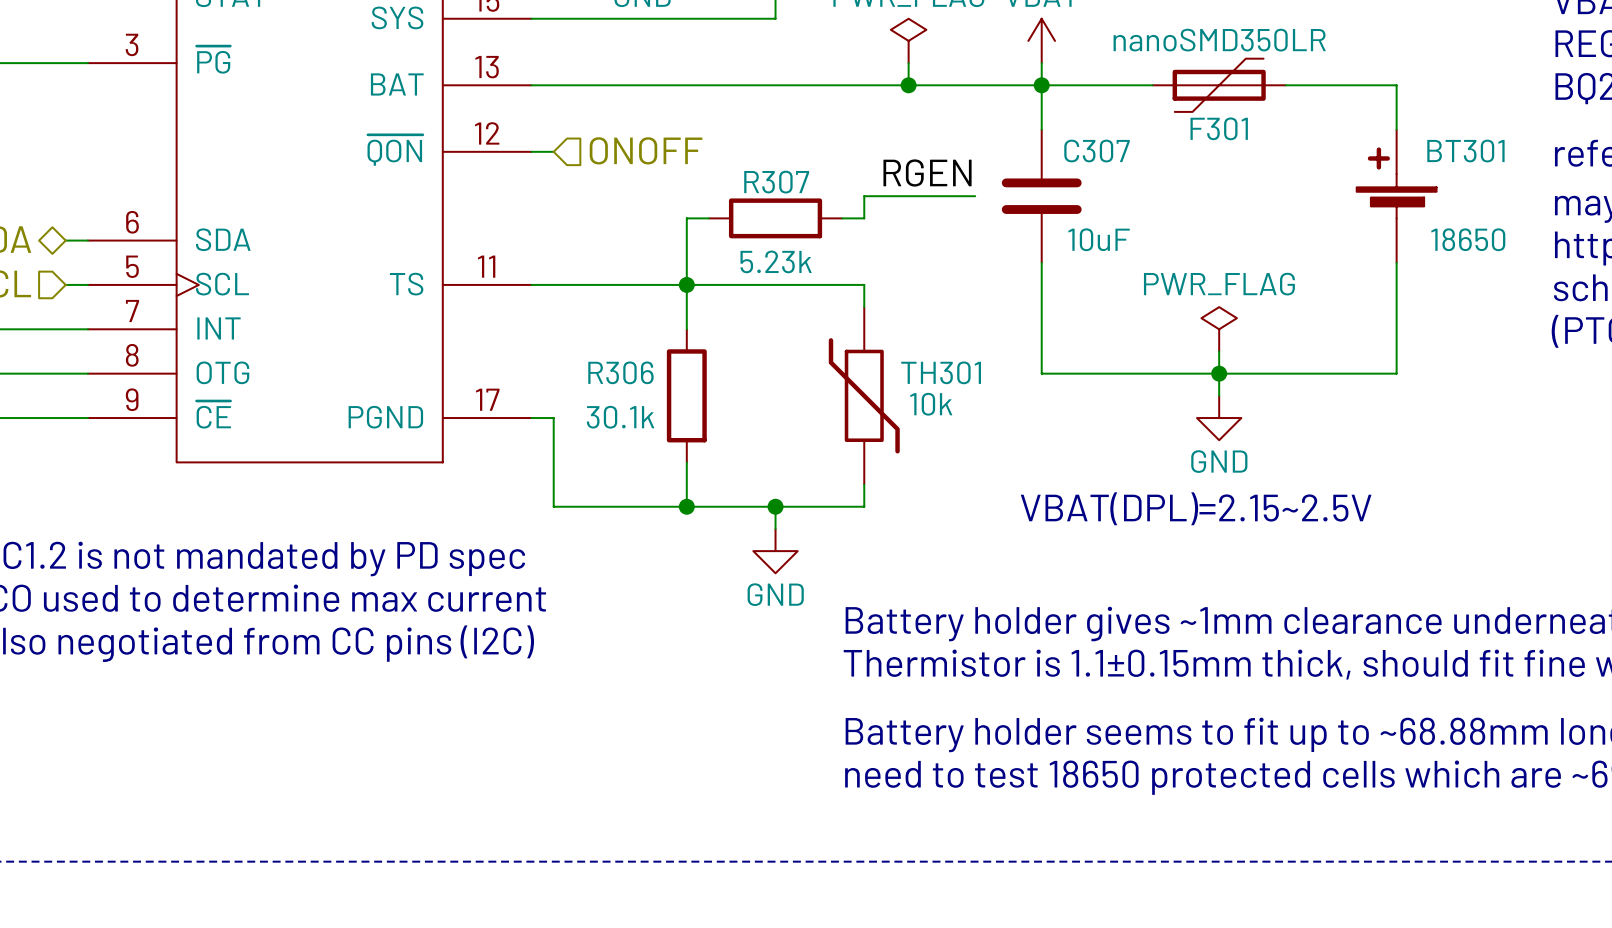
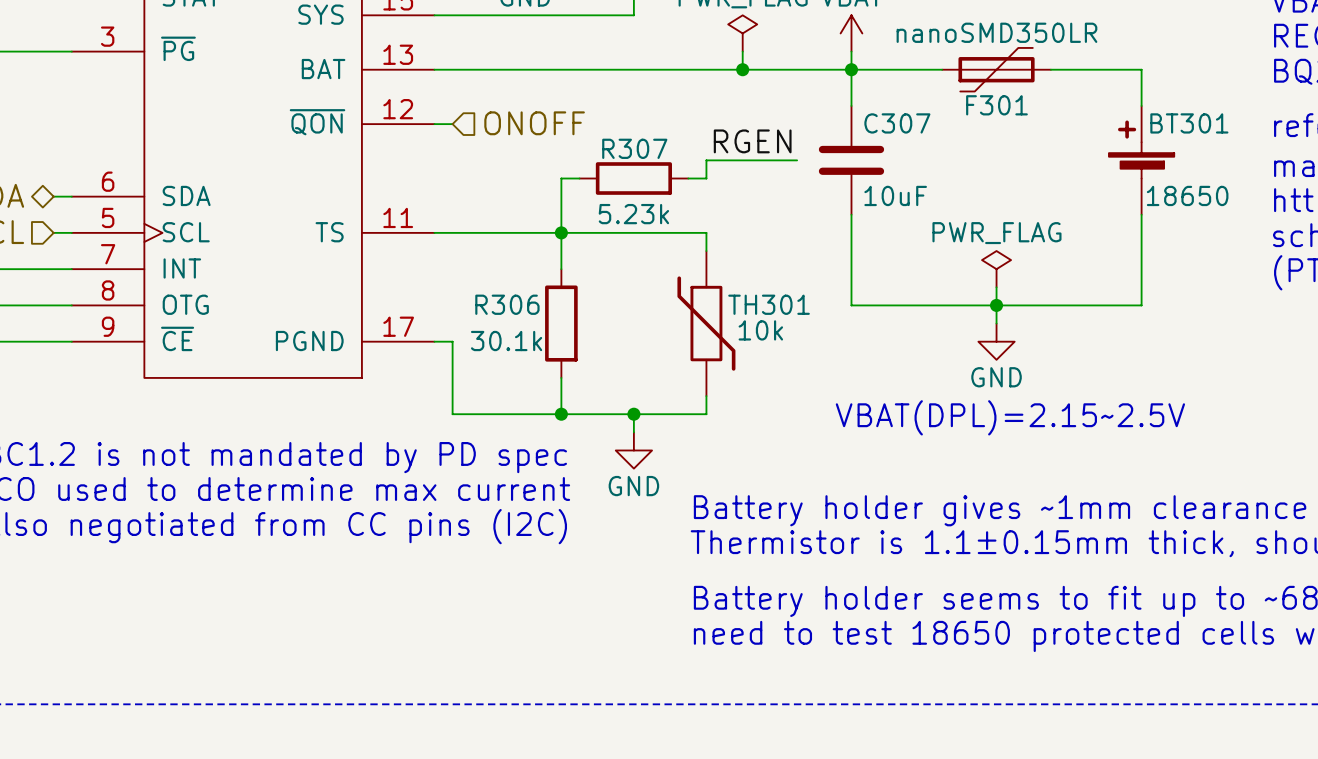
C307 name position: C307 (1097, 151) -> C307 (897, 123)
C307 value position: 10uF (1099, 239) -> 10uF (895, 195)

